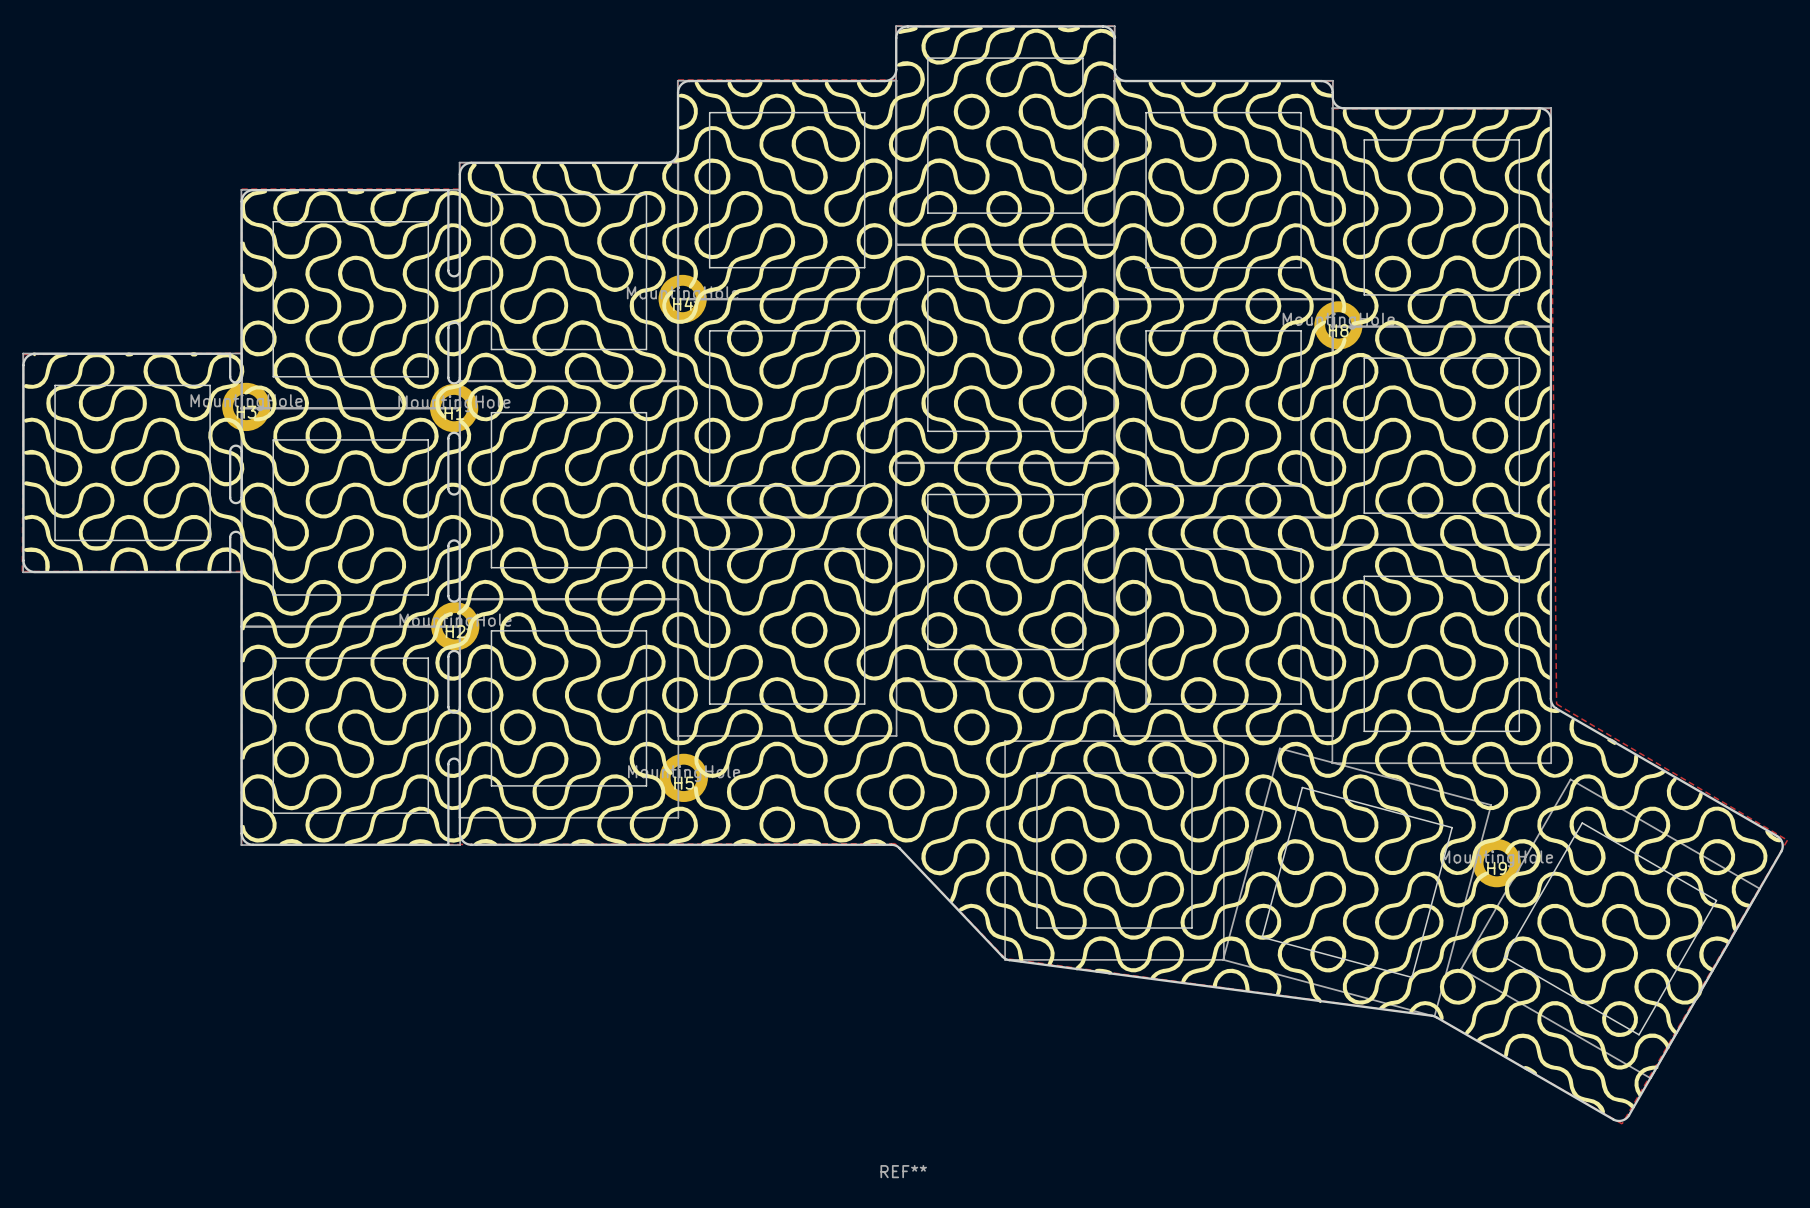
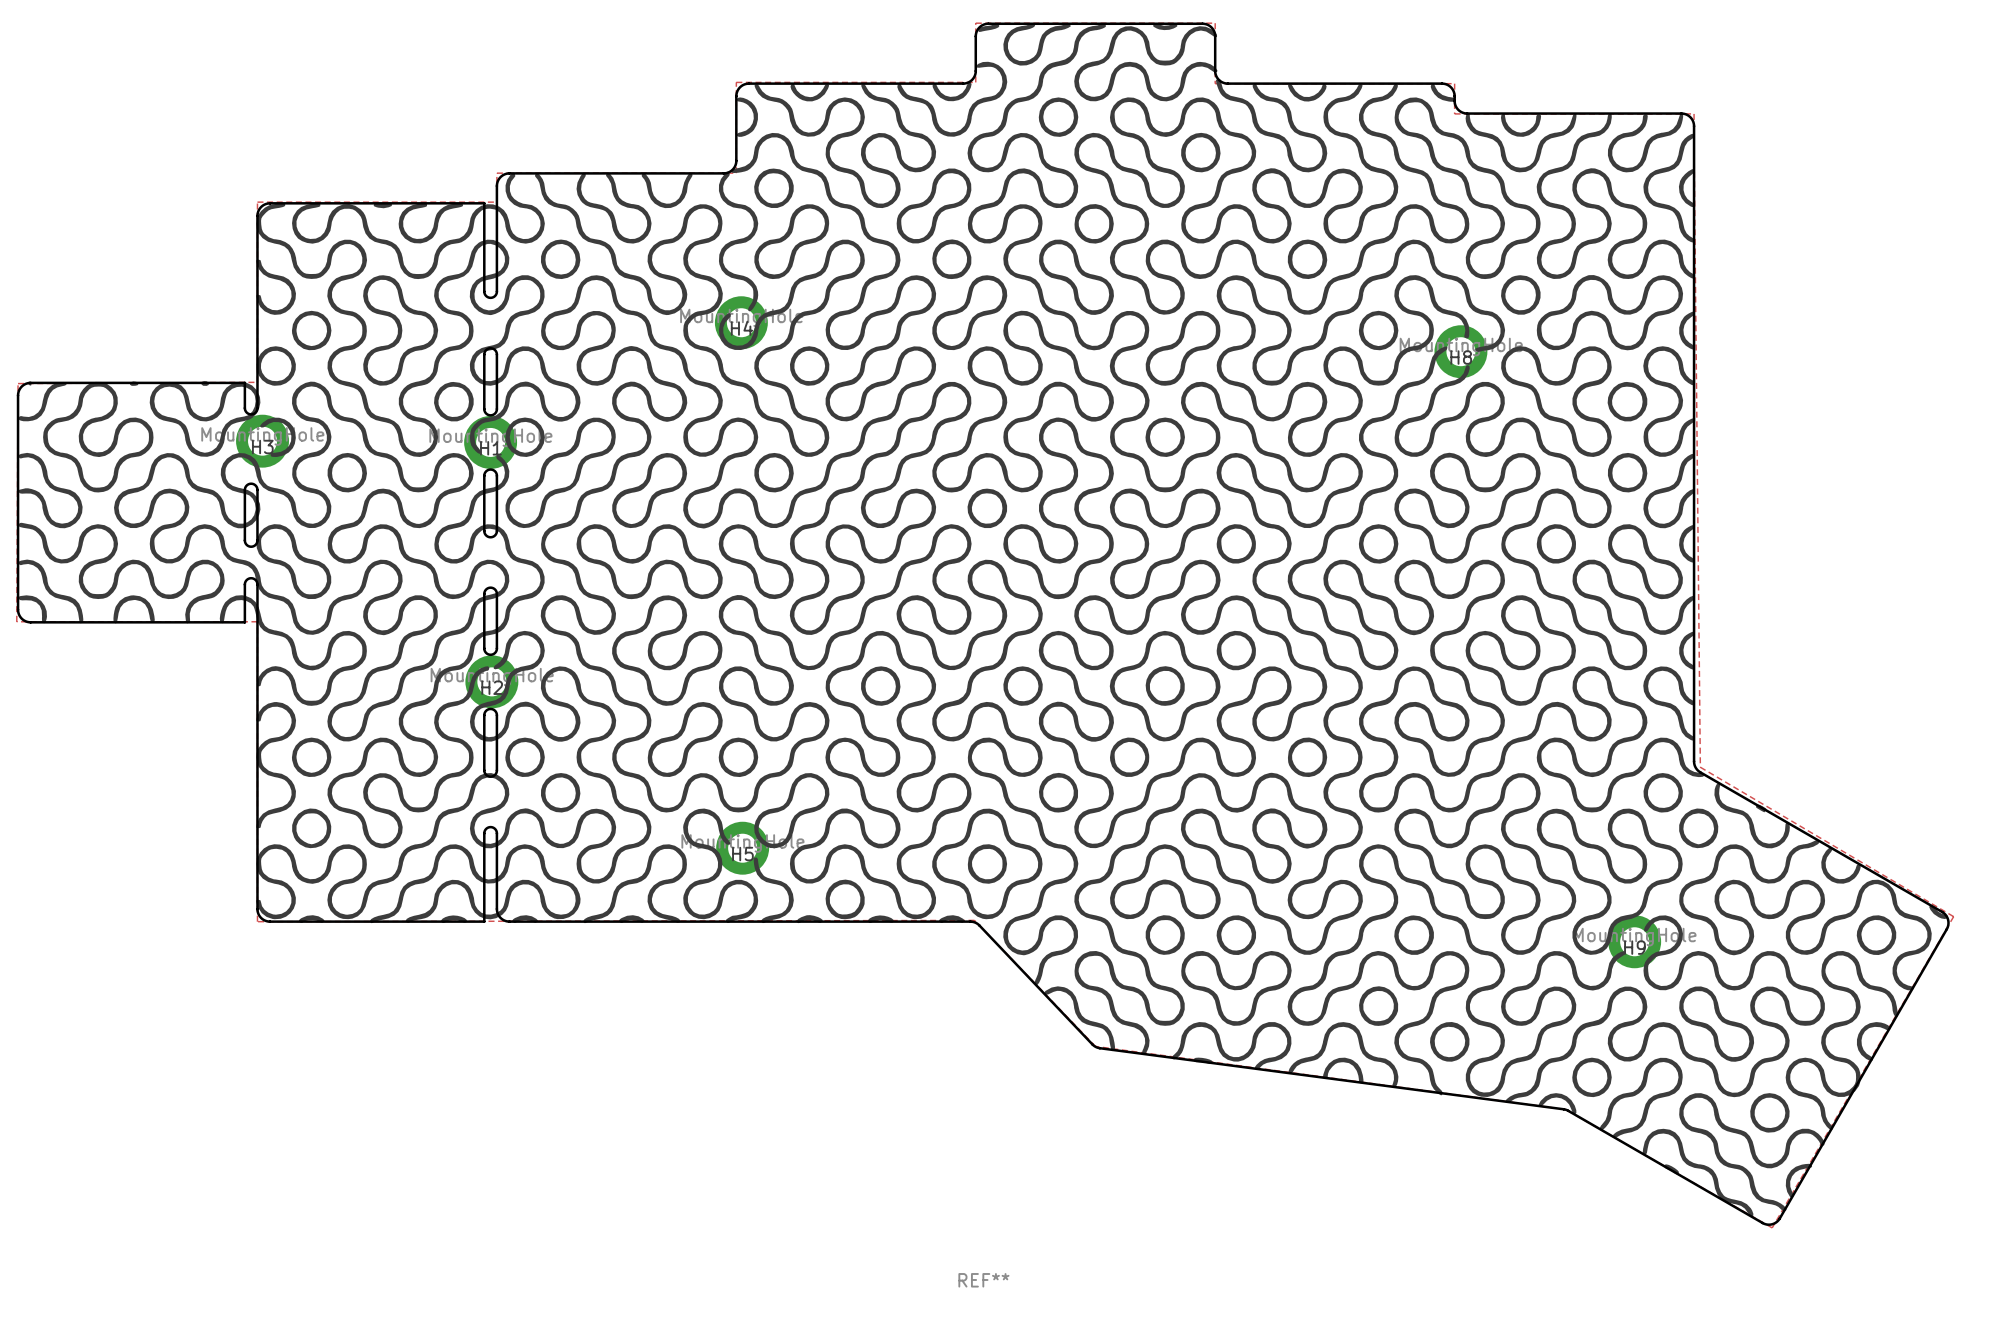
drawing: [22, 25, 1761, 1080] -> none

